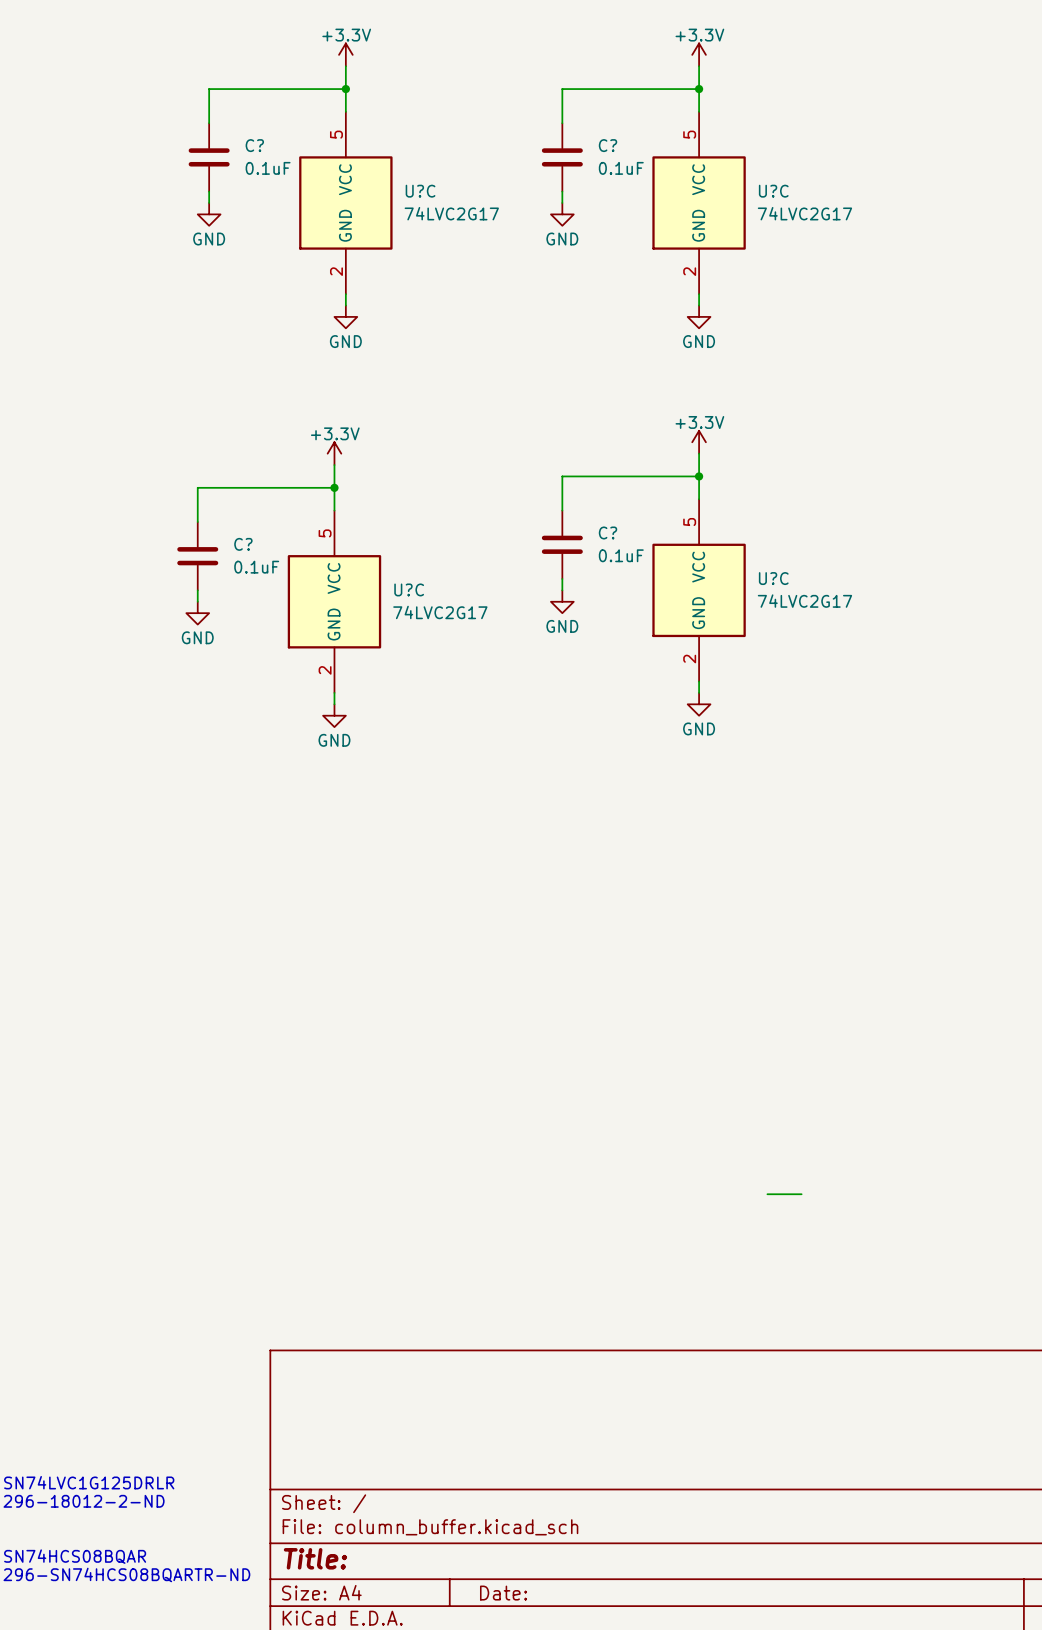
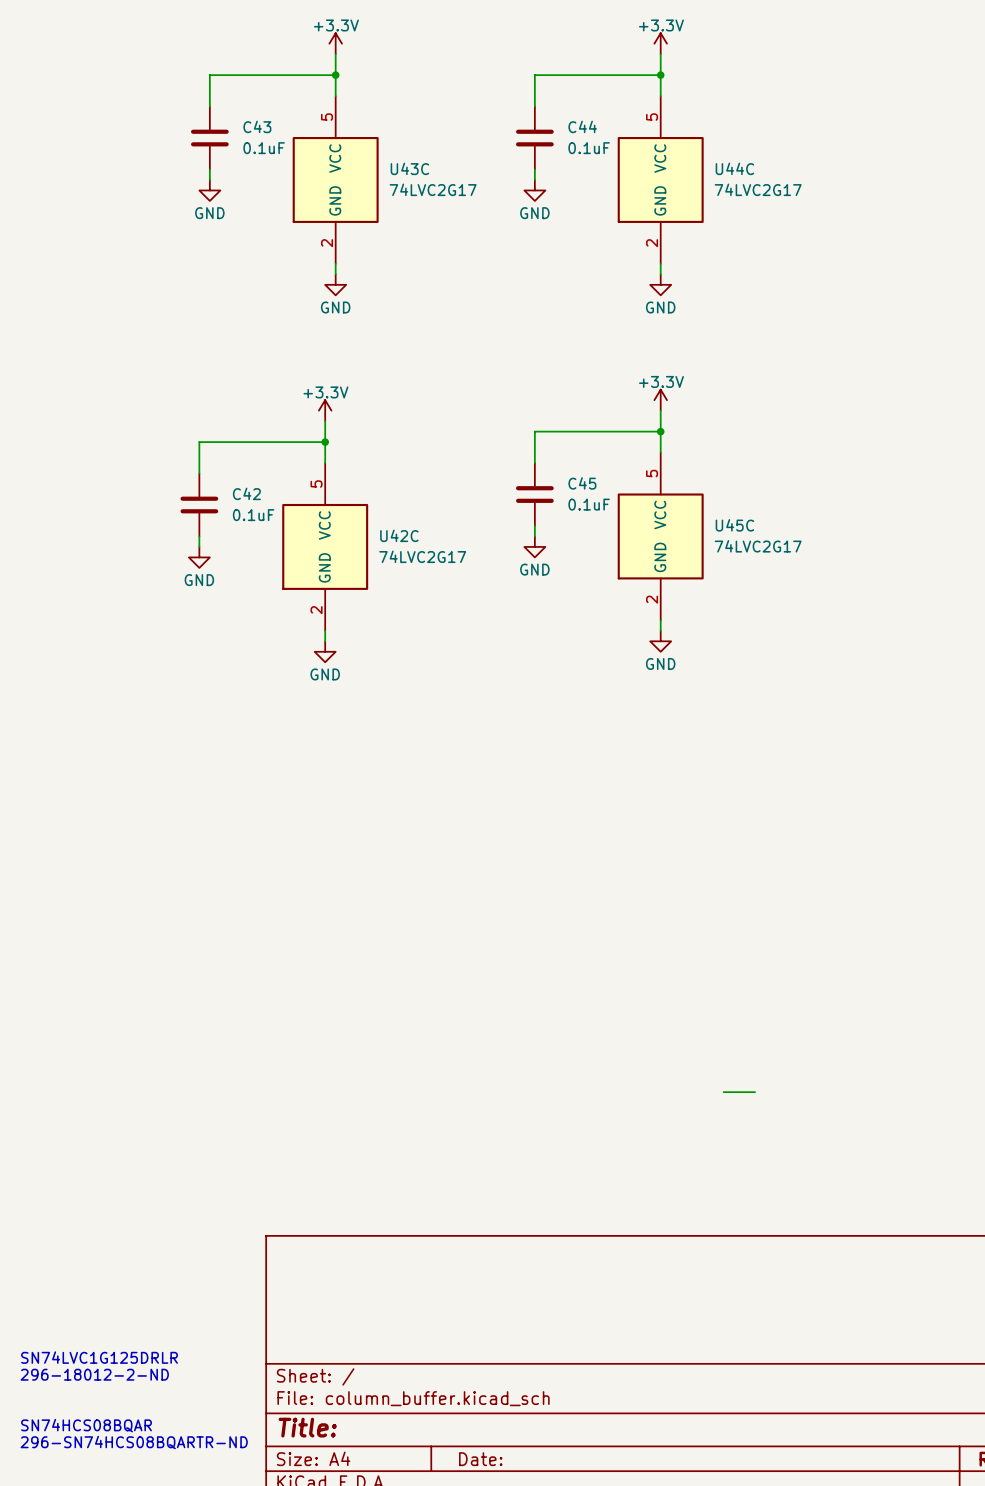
C? name: C? (254, 145) -> C43 (257, 126)
C? name: C? (608, 145) -> C44 (582, 126)
U?C name: U?C (420, 191) -> U43C (409, 168)
U?C name: U?C (773, 191) -> U44C (734, 168)
C? name: C? (608, 532) -> C45 (582, 483)
C? name: C? (243, 544) -> C42 (246, 493)
U?C name: U?C (773, 578) -> U45C (734, 525)
U?C name: U?C (409, 589) -> U42C (399, 535)

